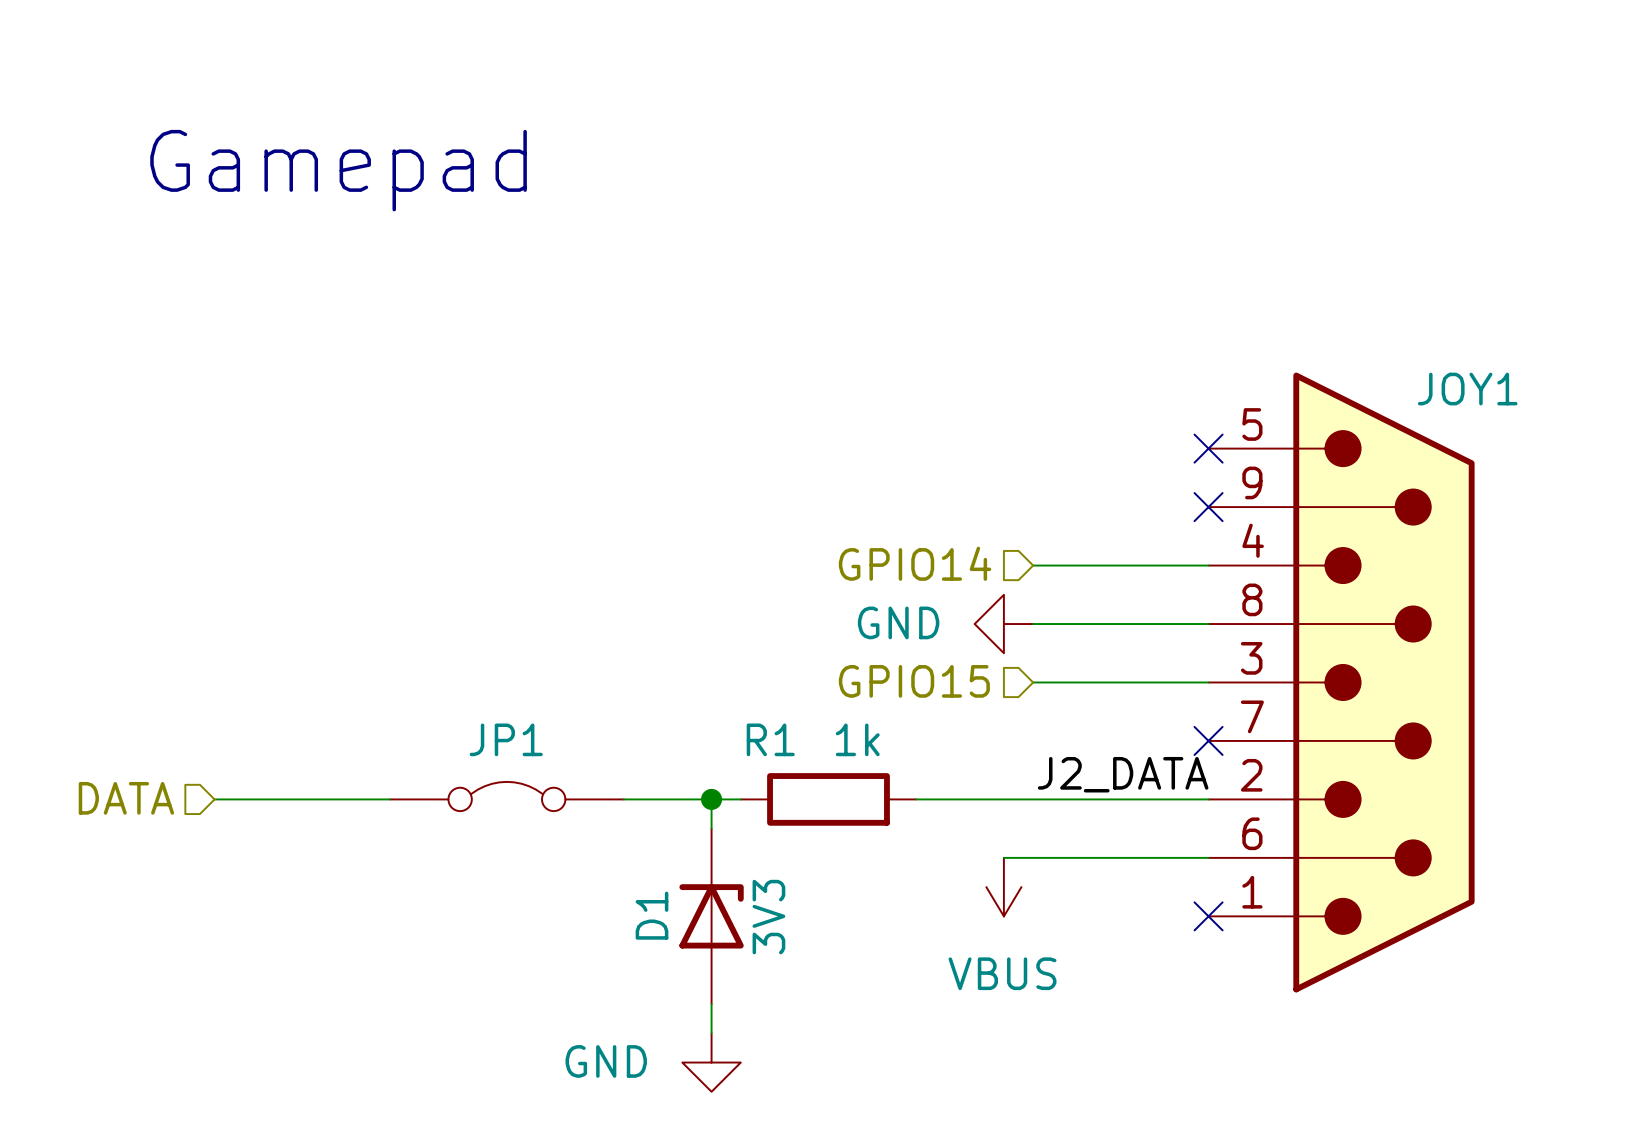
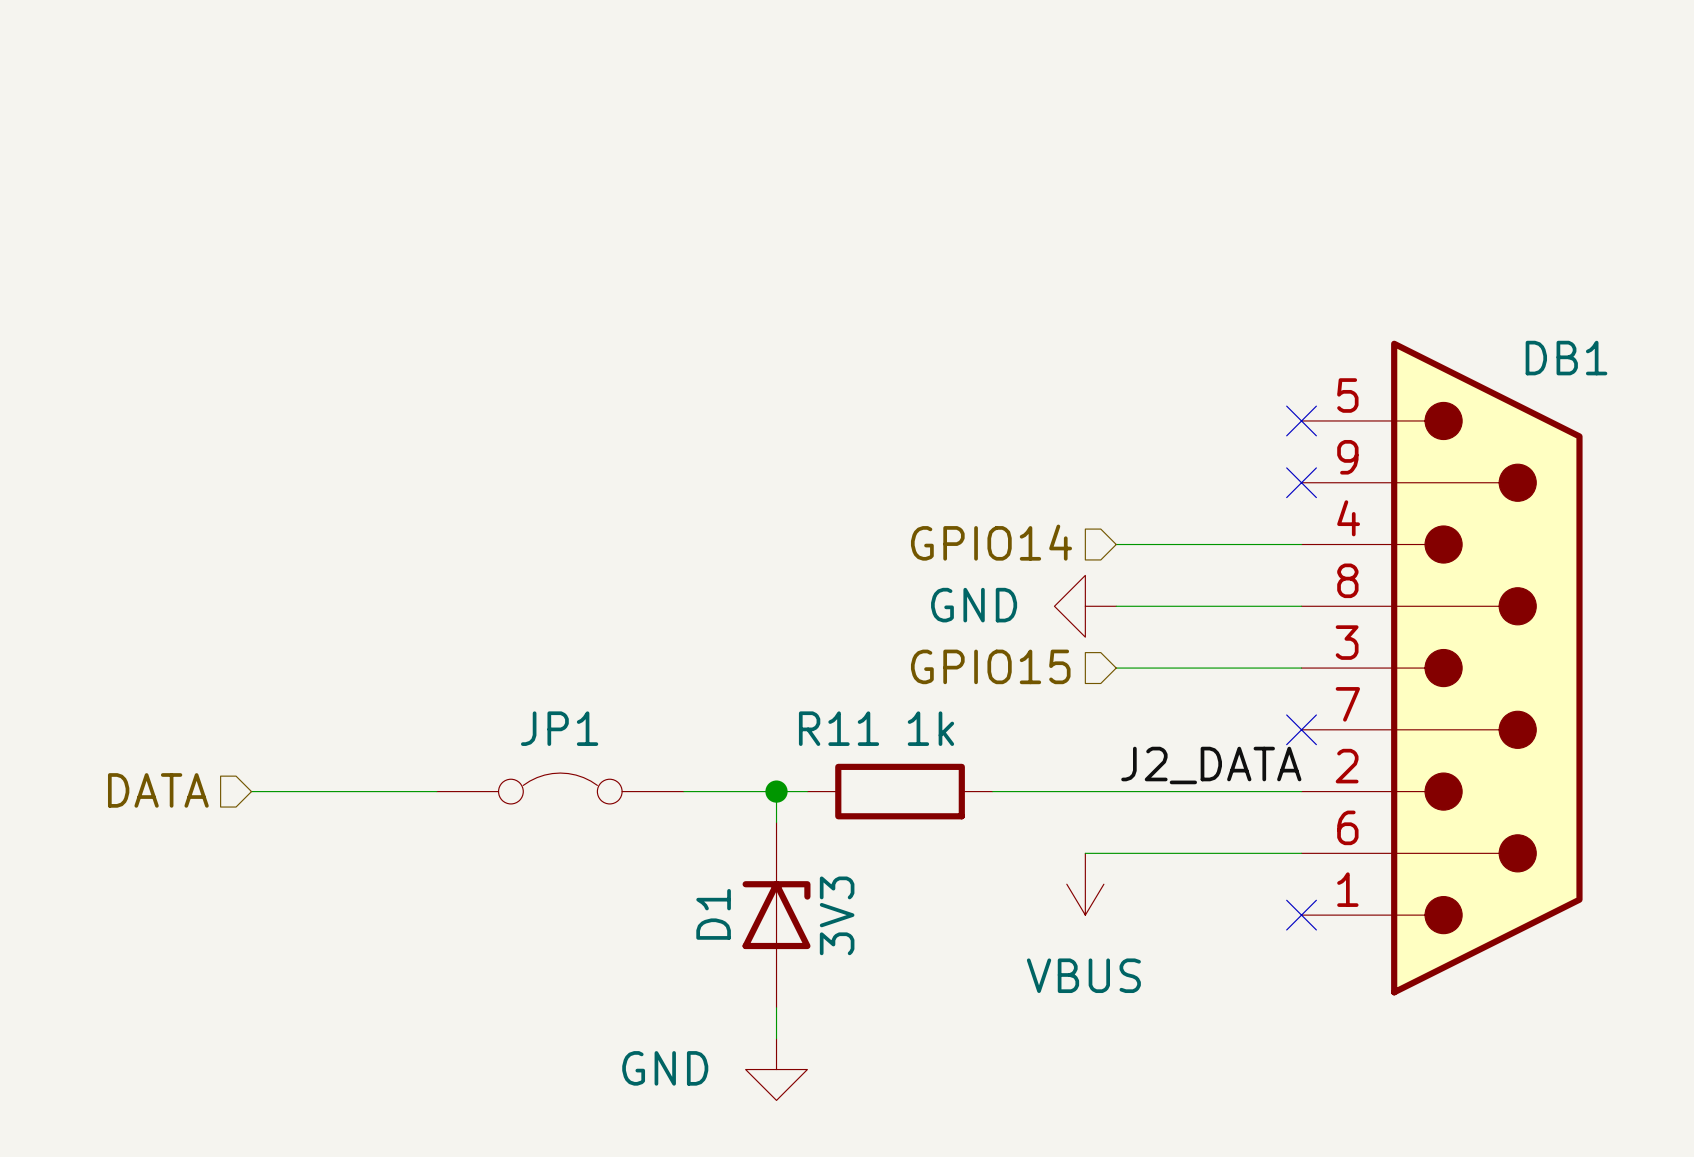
text: Gamepad (338, 170) -> none
JOY1 name: JOY1 (1467, 389) -> DB1 (1566, 358)
R1 name: R1 (770, 739) -> R11 (839, 728)

